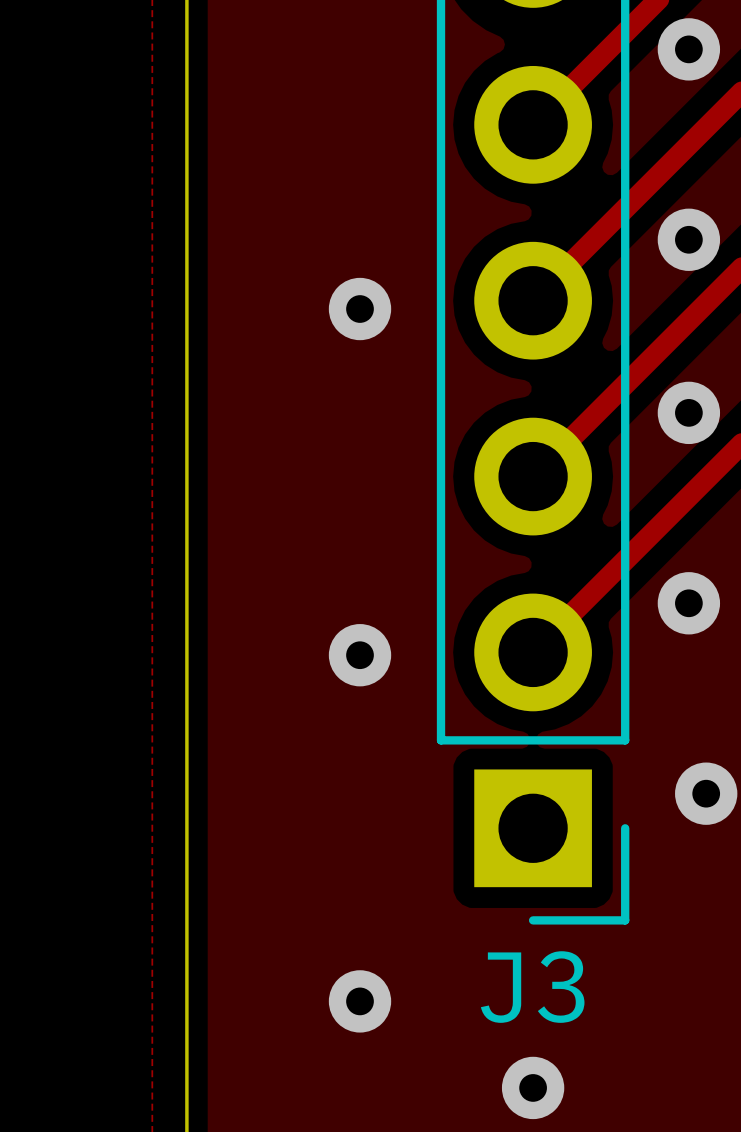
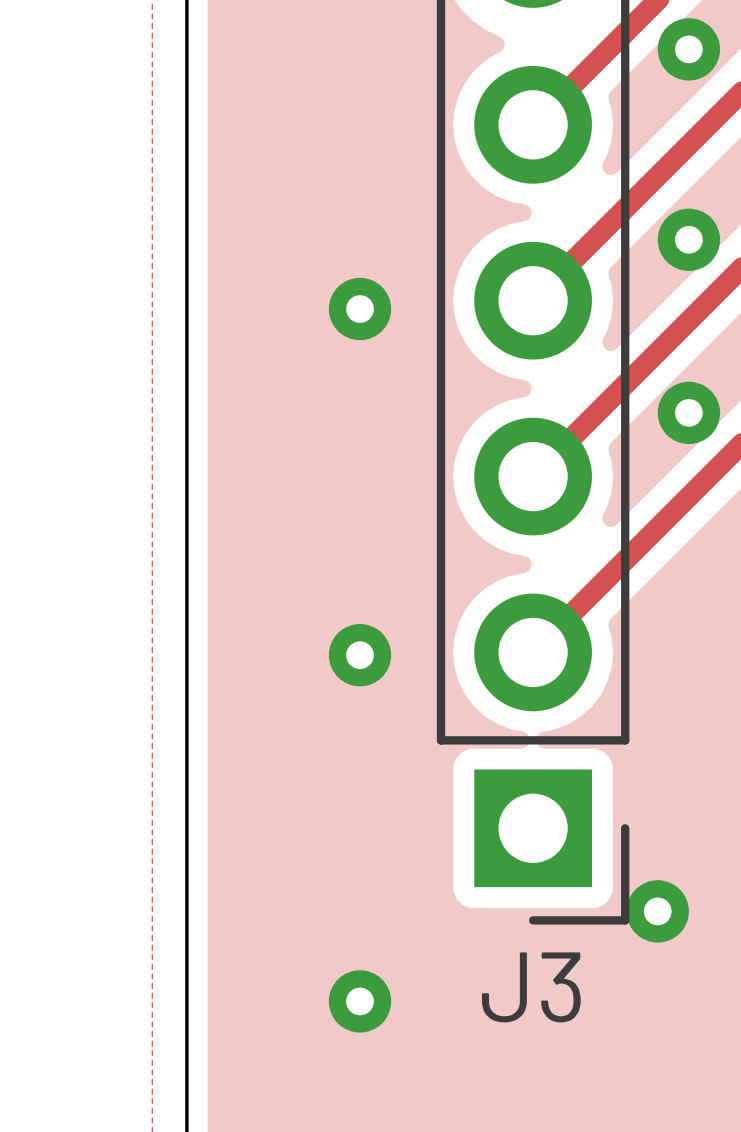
via: (688, 603) -> none
via: (706, 793) -> none
via: none -> (657, 911)
via: (533, 1087) -> none

